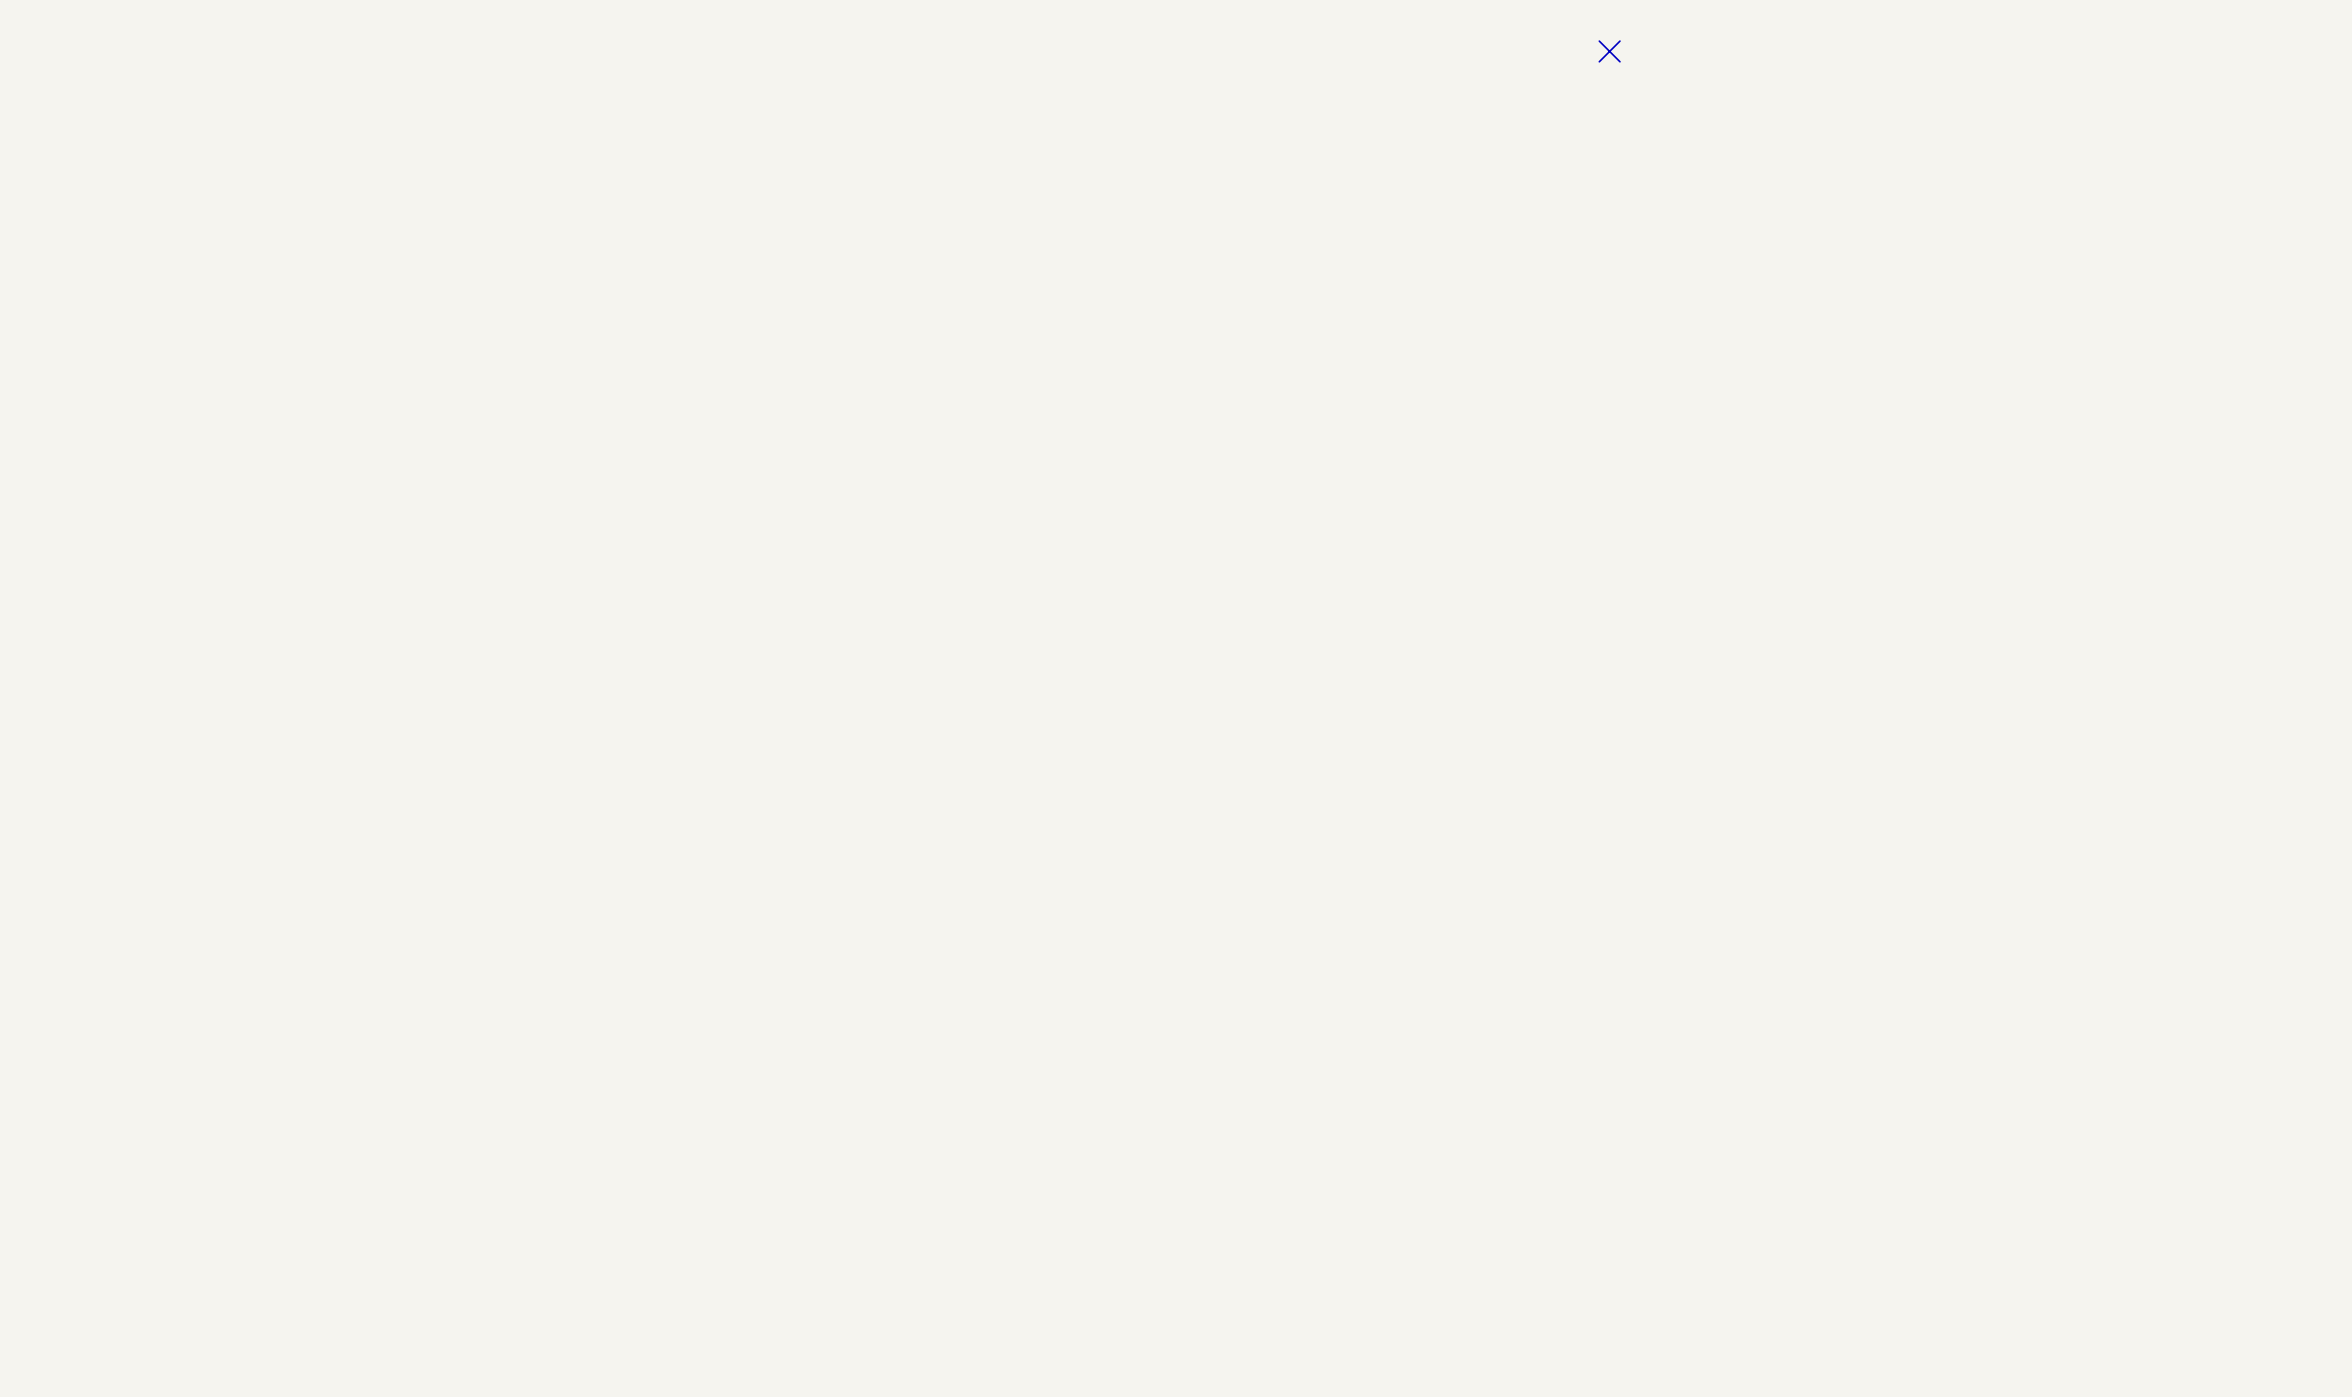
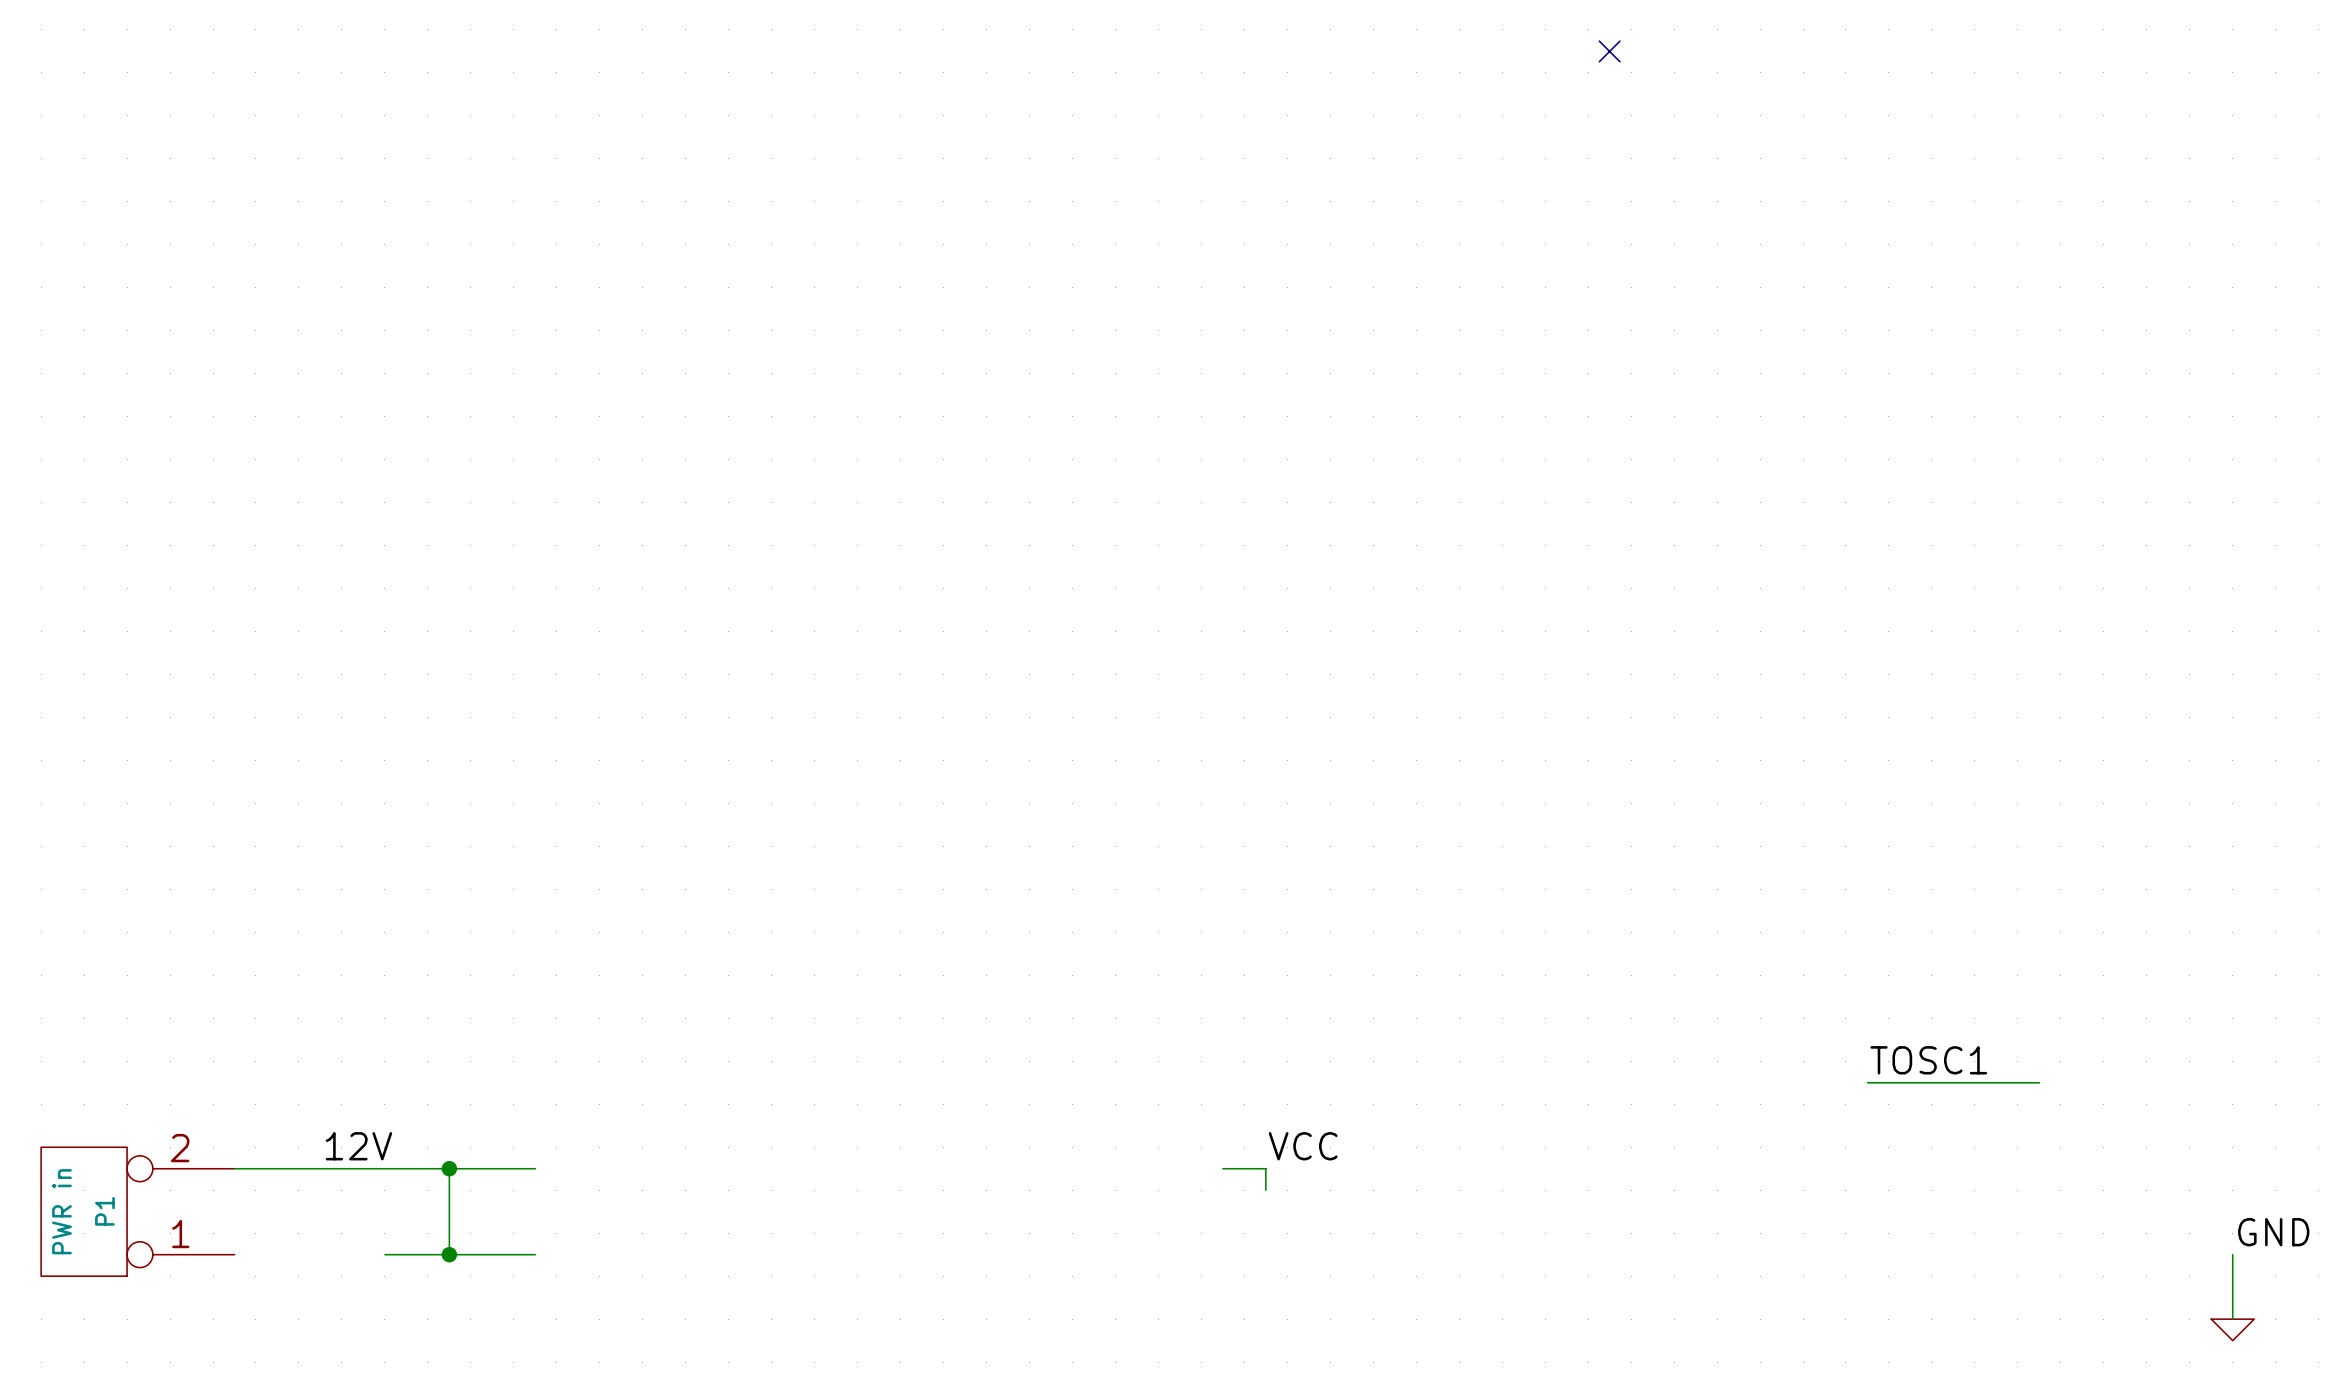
label: none -> TOSC1 (1928, 1060)
wire: none -> (1867, 1082) (2039, 1082)
label: none -> 12V (358, 1146)
label: none -> VCC (1303, 1146)
wire: none -> (234, 1168) (535, 1168)
wire: none -> (449, 1168) (449, 1254)
junction: none -> (449, 1168)
wire: none -> (1222, 1168) (1265, 1168) (1265, 1190)
P1: none -> PWR in (137, 1211)
label: none -> GND (2273, 1232)
wire: none -> (384, 1254) (535, 1254)
junction: none -> (449, 1254)
wire: none -> (2232, 1254) (2232, 1319)
power symbol: none -> (2232, 1329)

